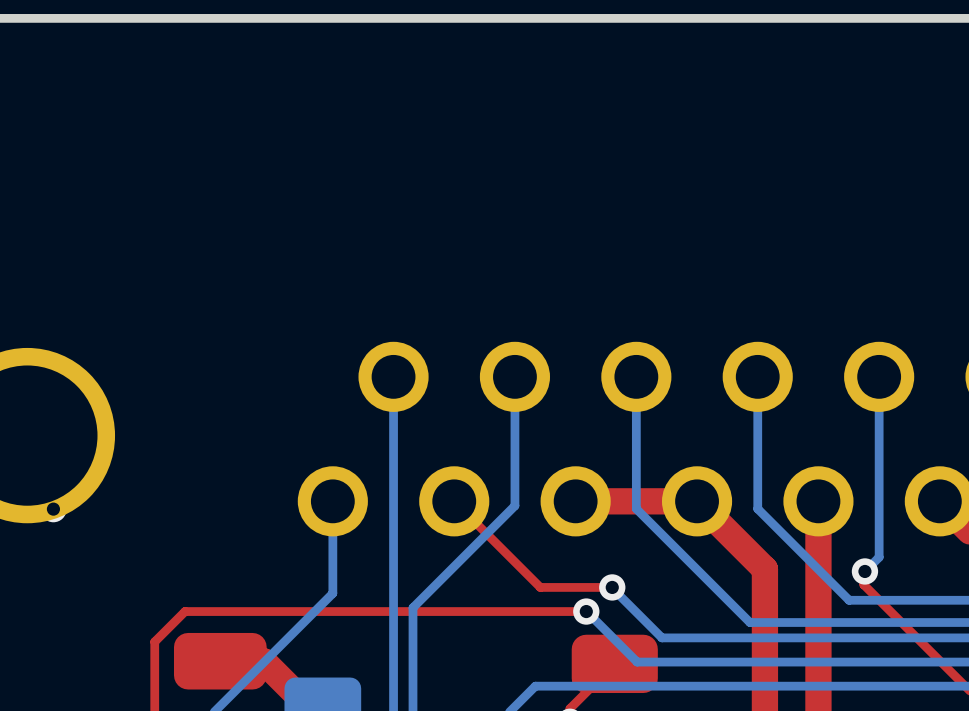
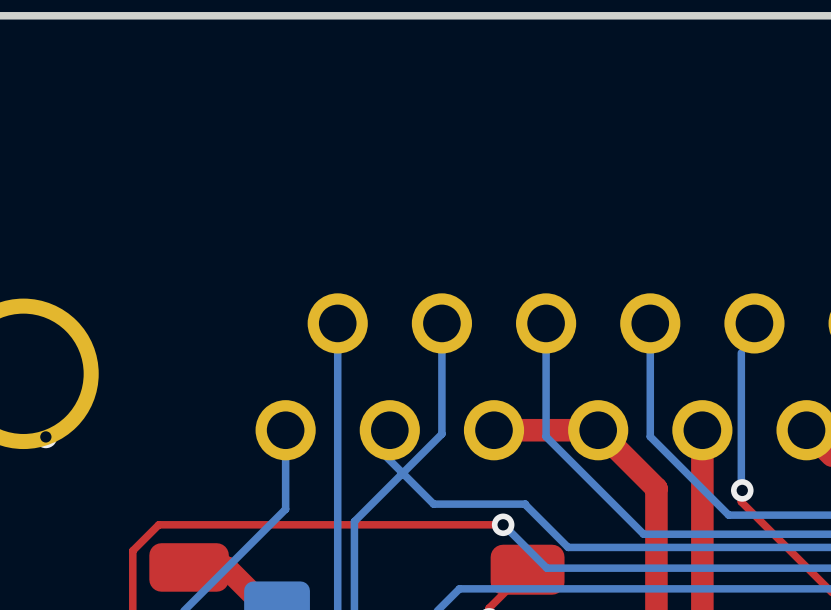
bottom track: (879, 376) (879, 557) (864, 571) -> (741, 352) (742, 490)
top track: (454, 501) (540, 587) (612, 587) -> none
bottom track: none -> (376, 443) (376, 447) (433, 504) (525, 504)
via: (612, 587) -> none

